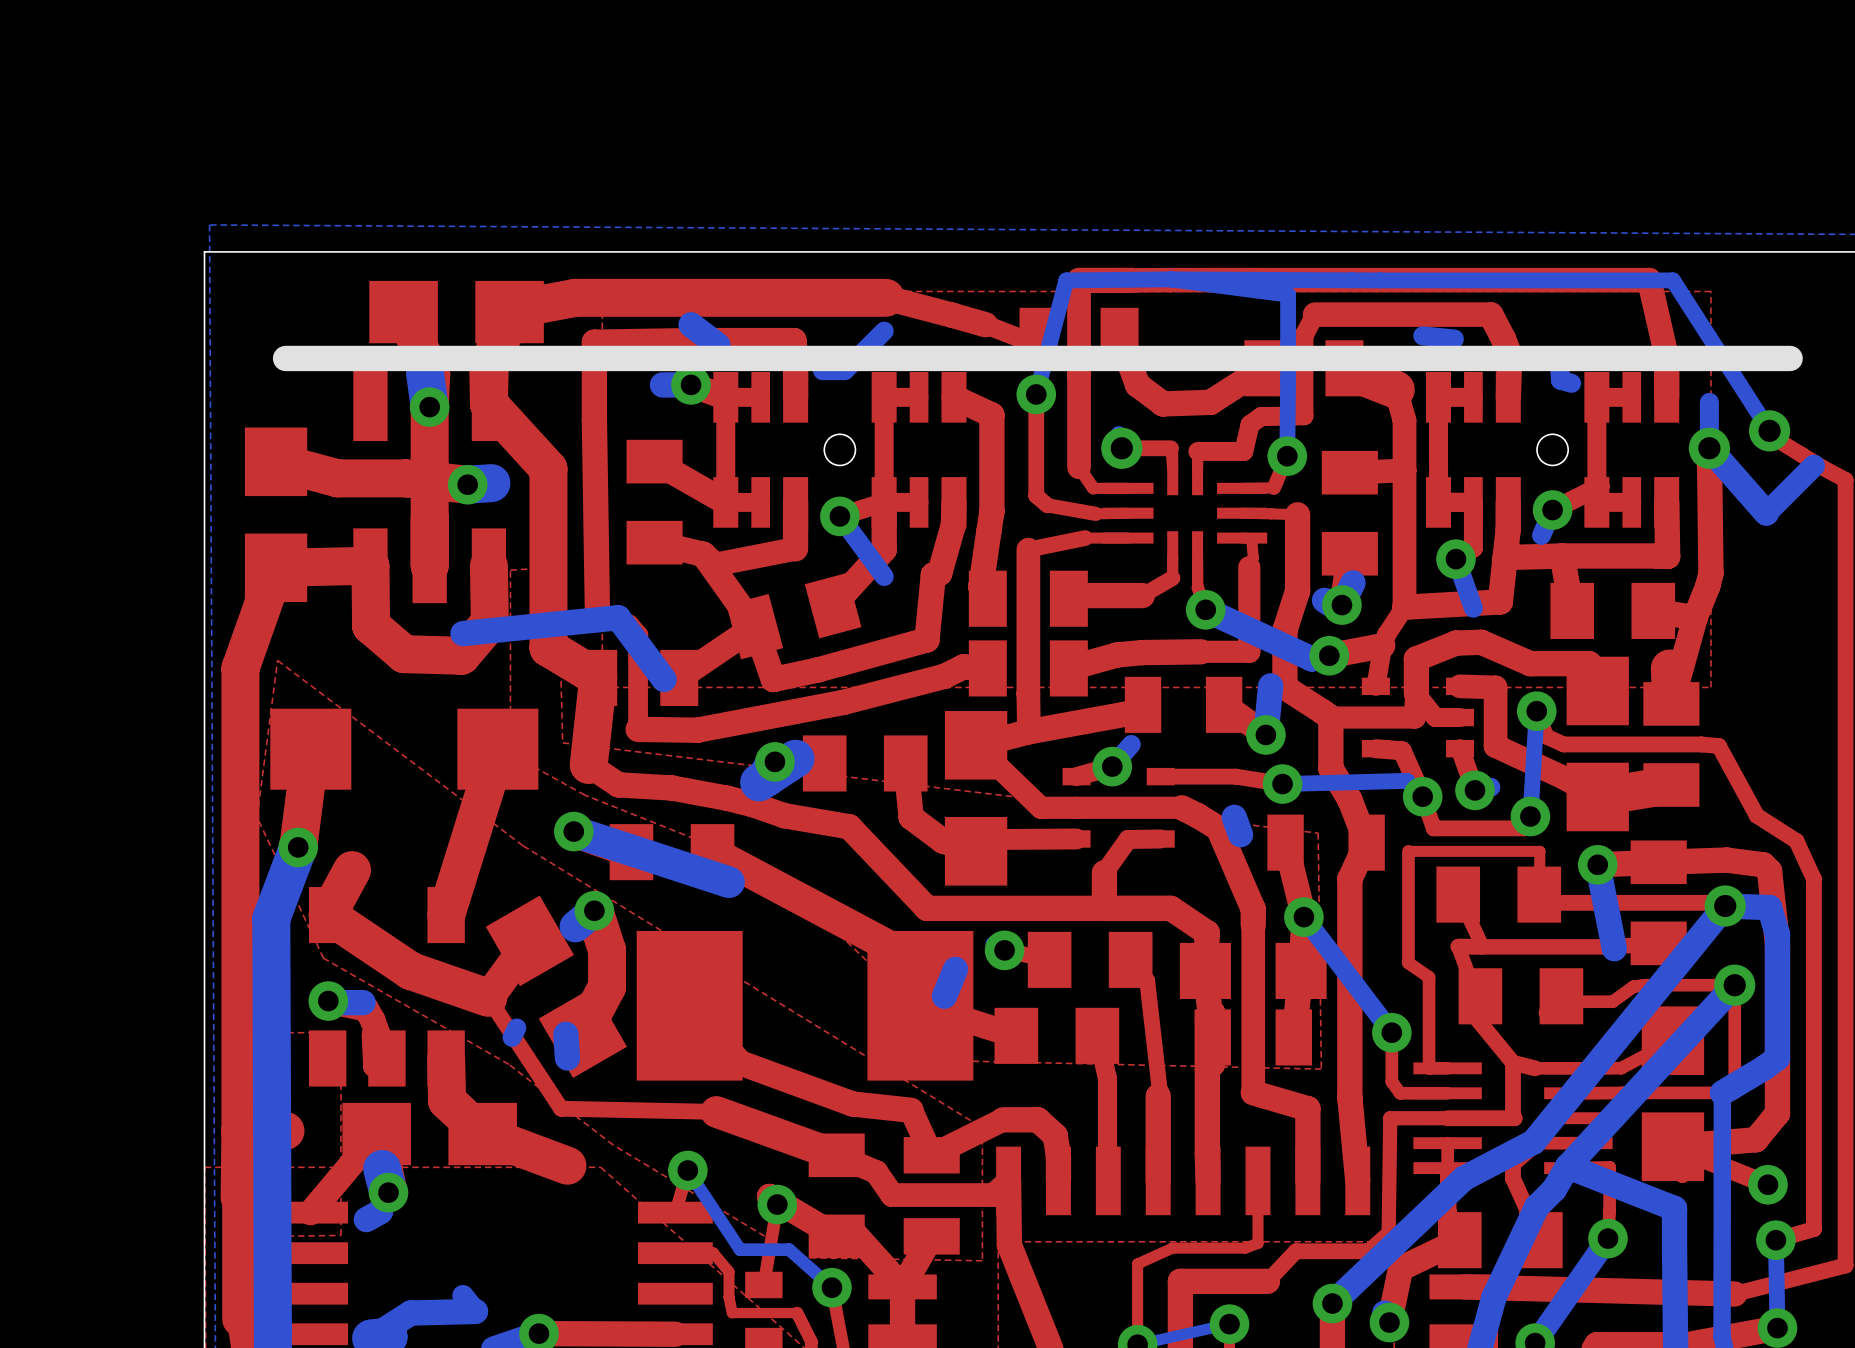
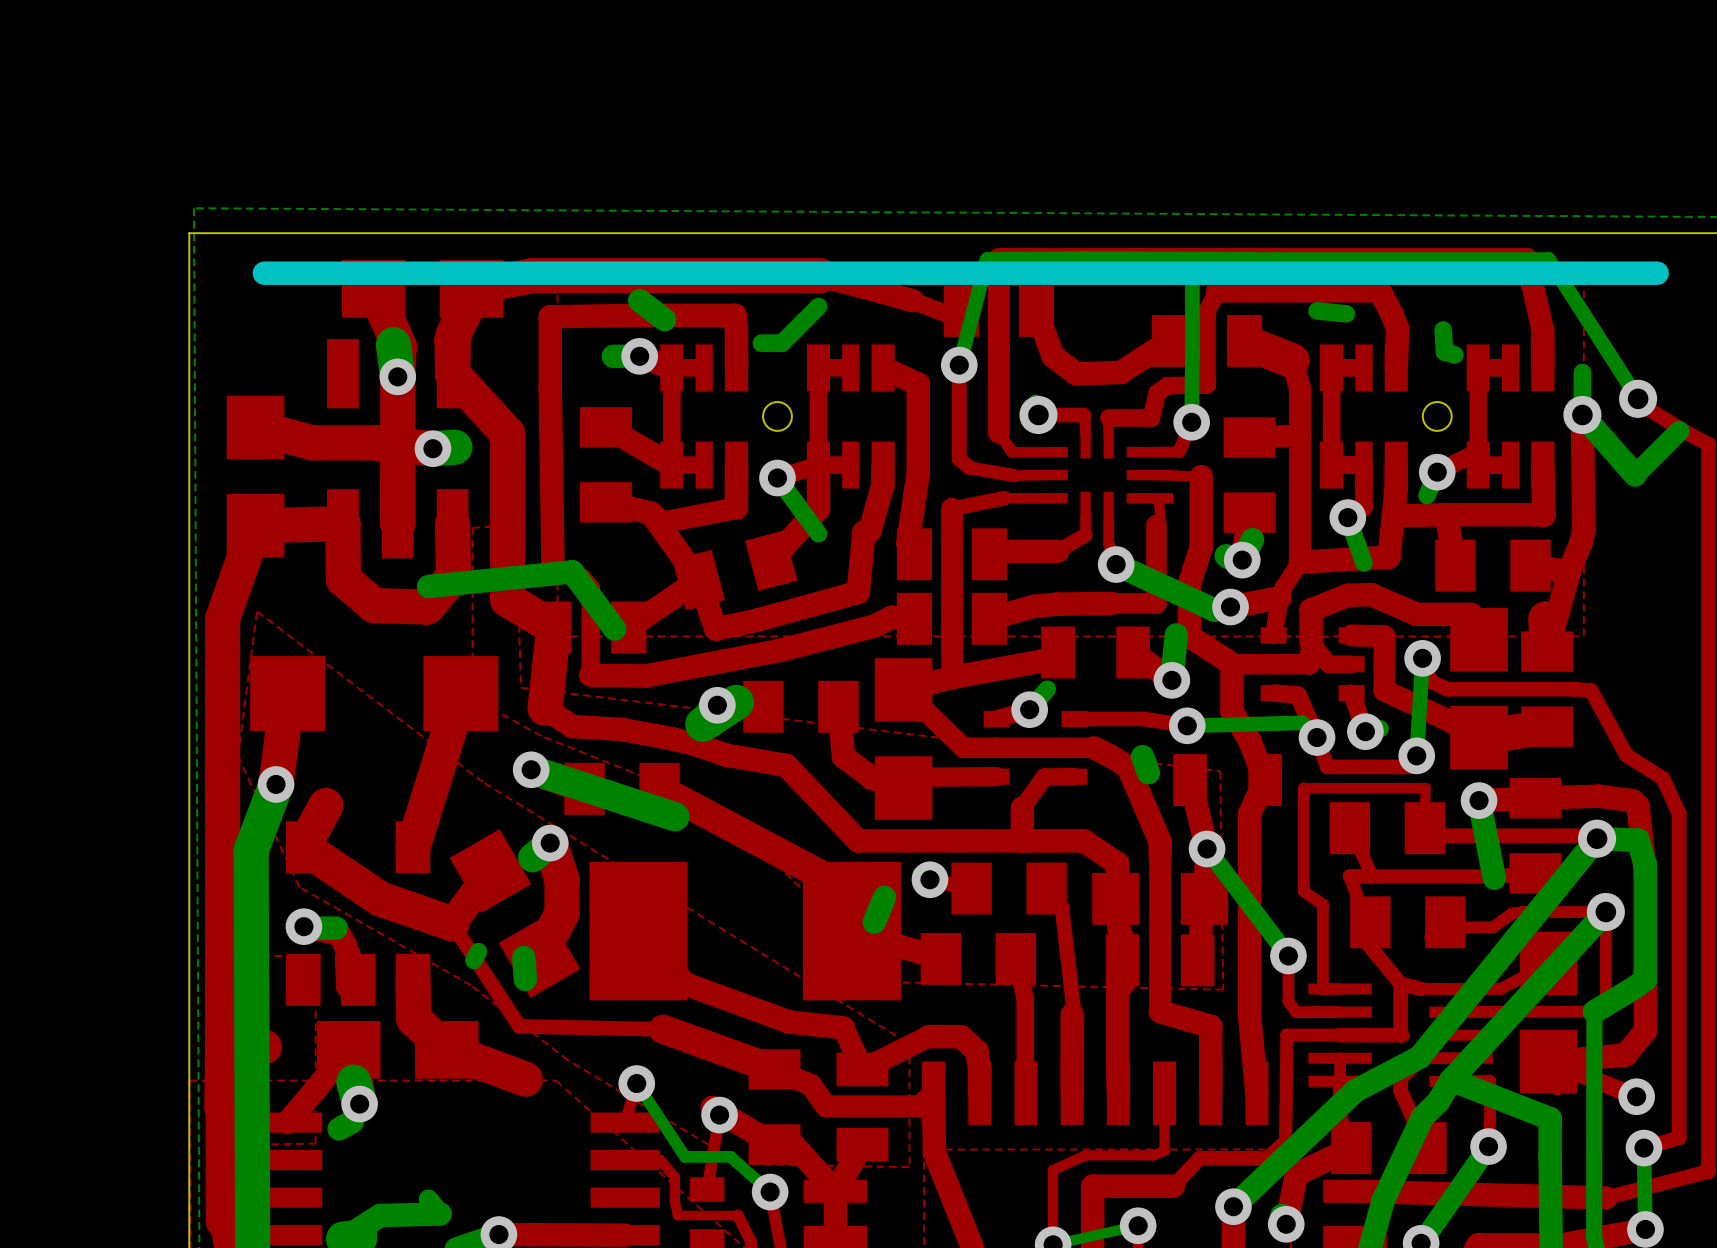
line: (1790, 358) (285, 358) -> (1657, 273) (264, 273)

